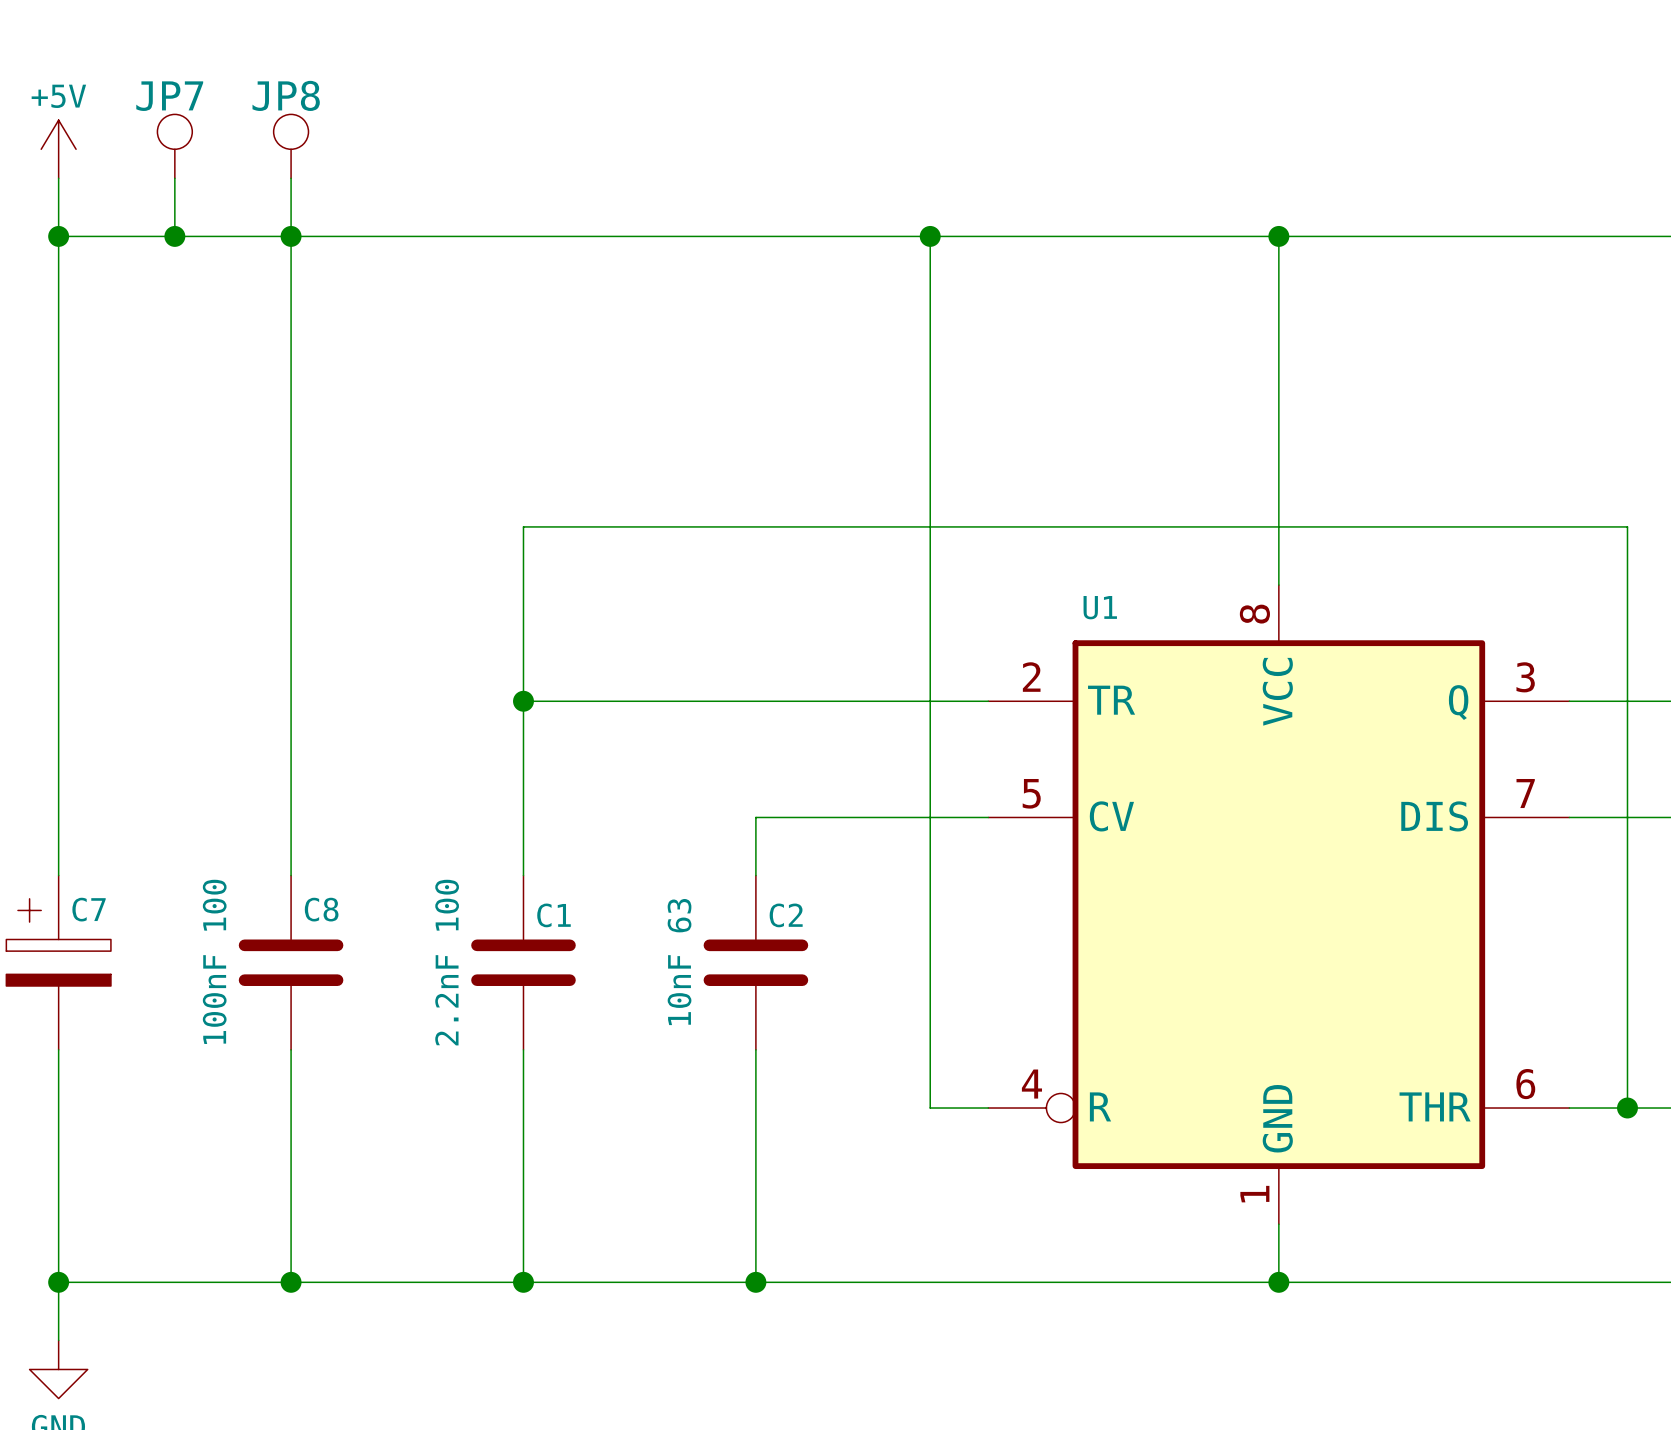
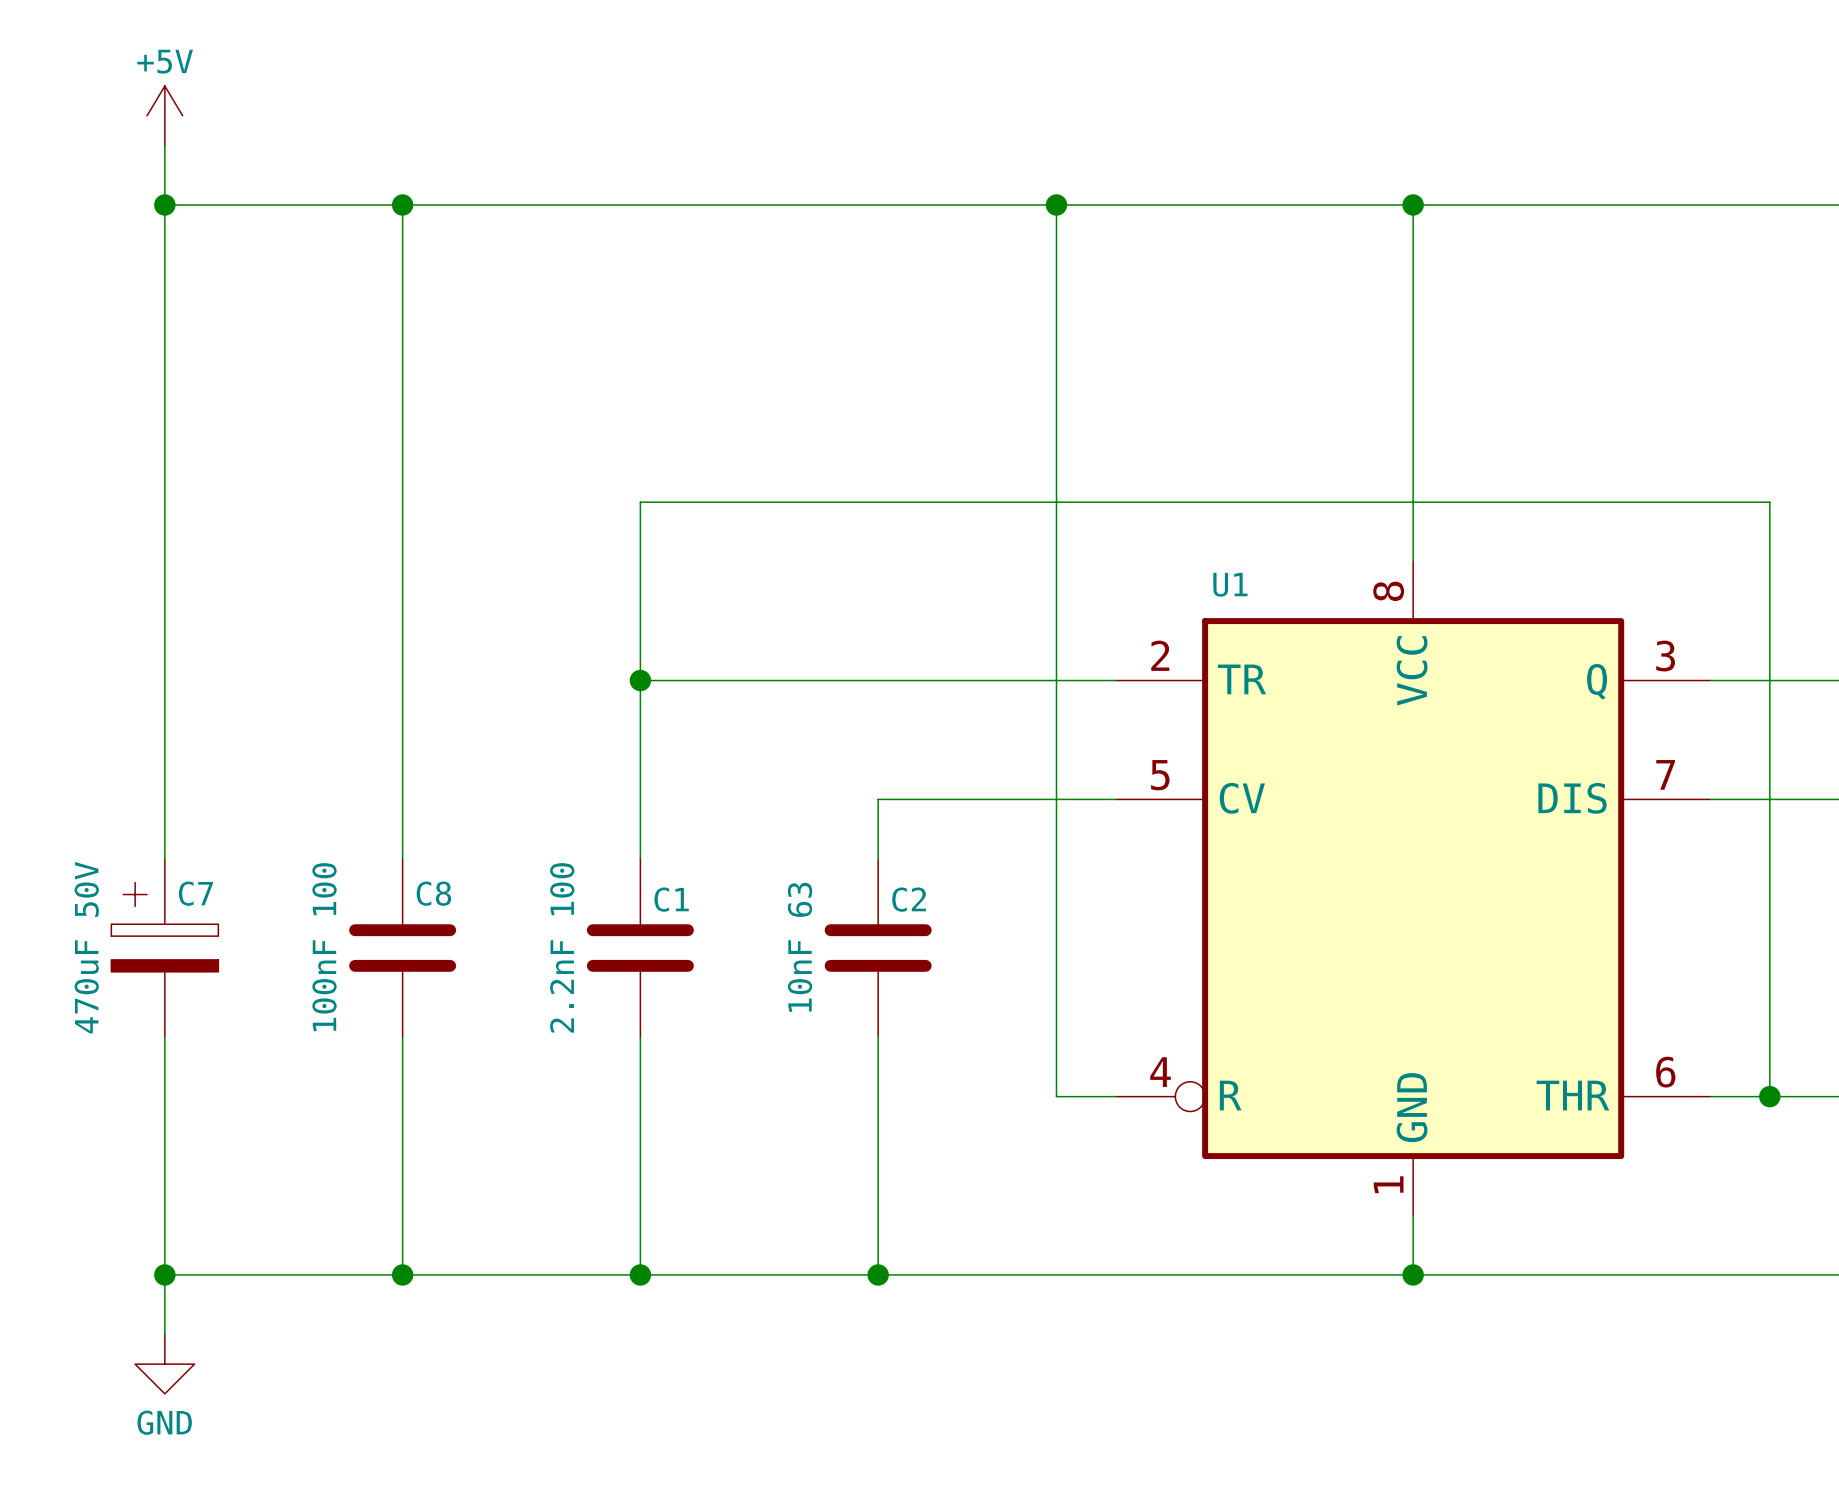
JP7: (174, 146) -> none
JP8: (291, 146) -> none
wire: (174, 178) (174, 236) -> none
wire: (291, 178) (291, 236) -> none
junction: (174, 236) -> none

